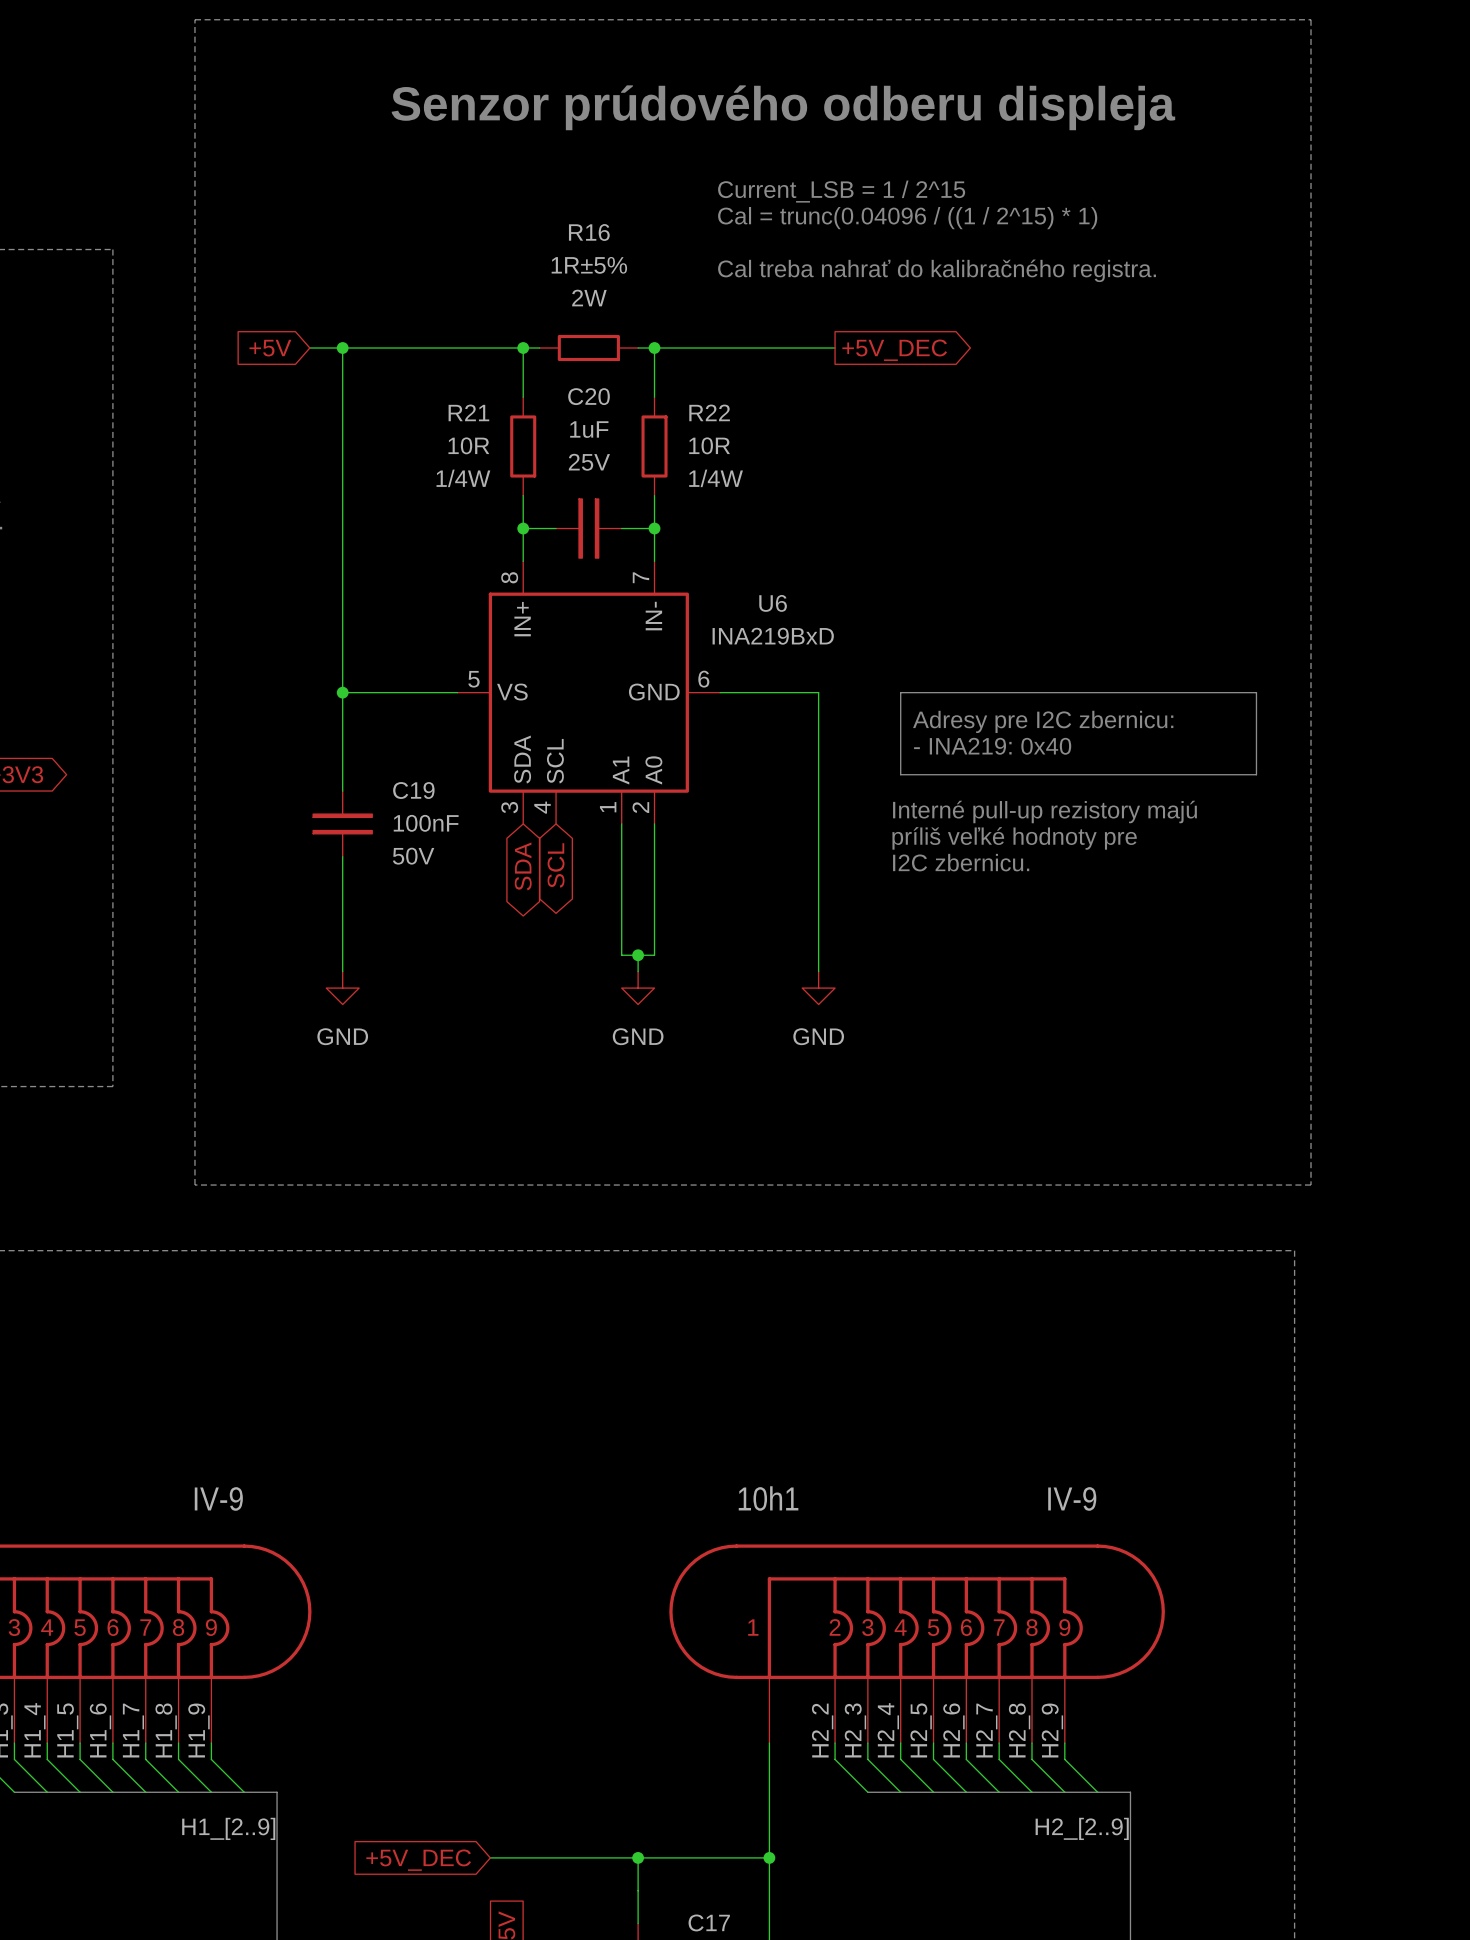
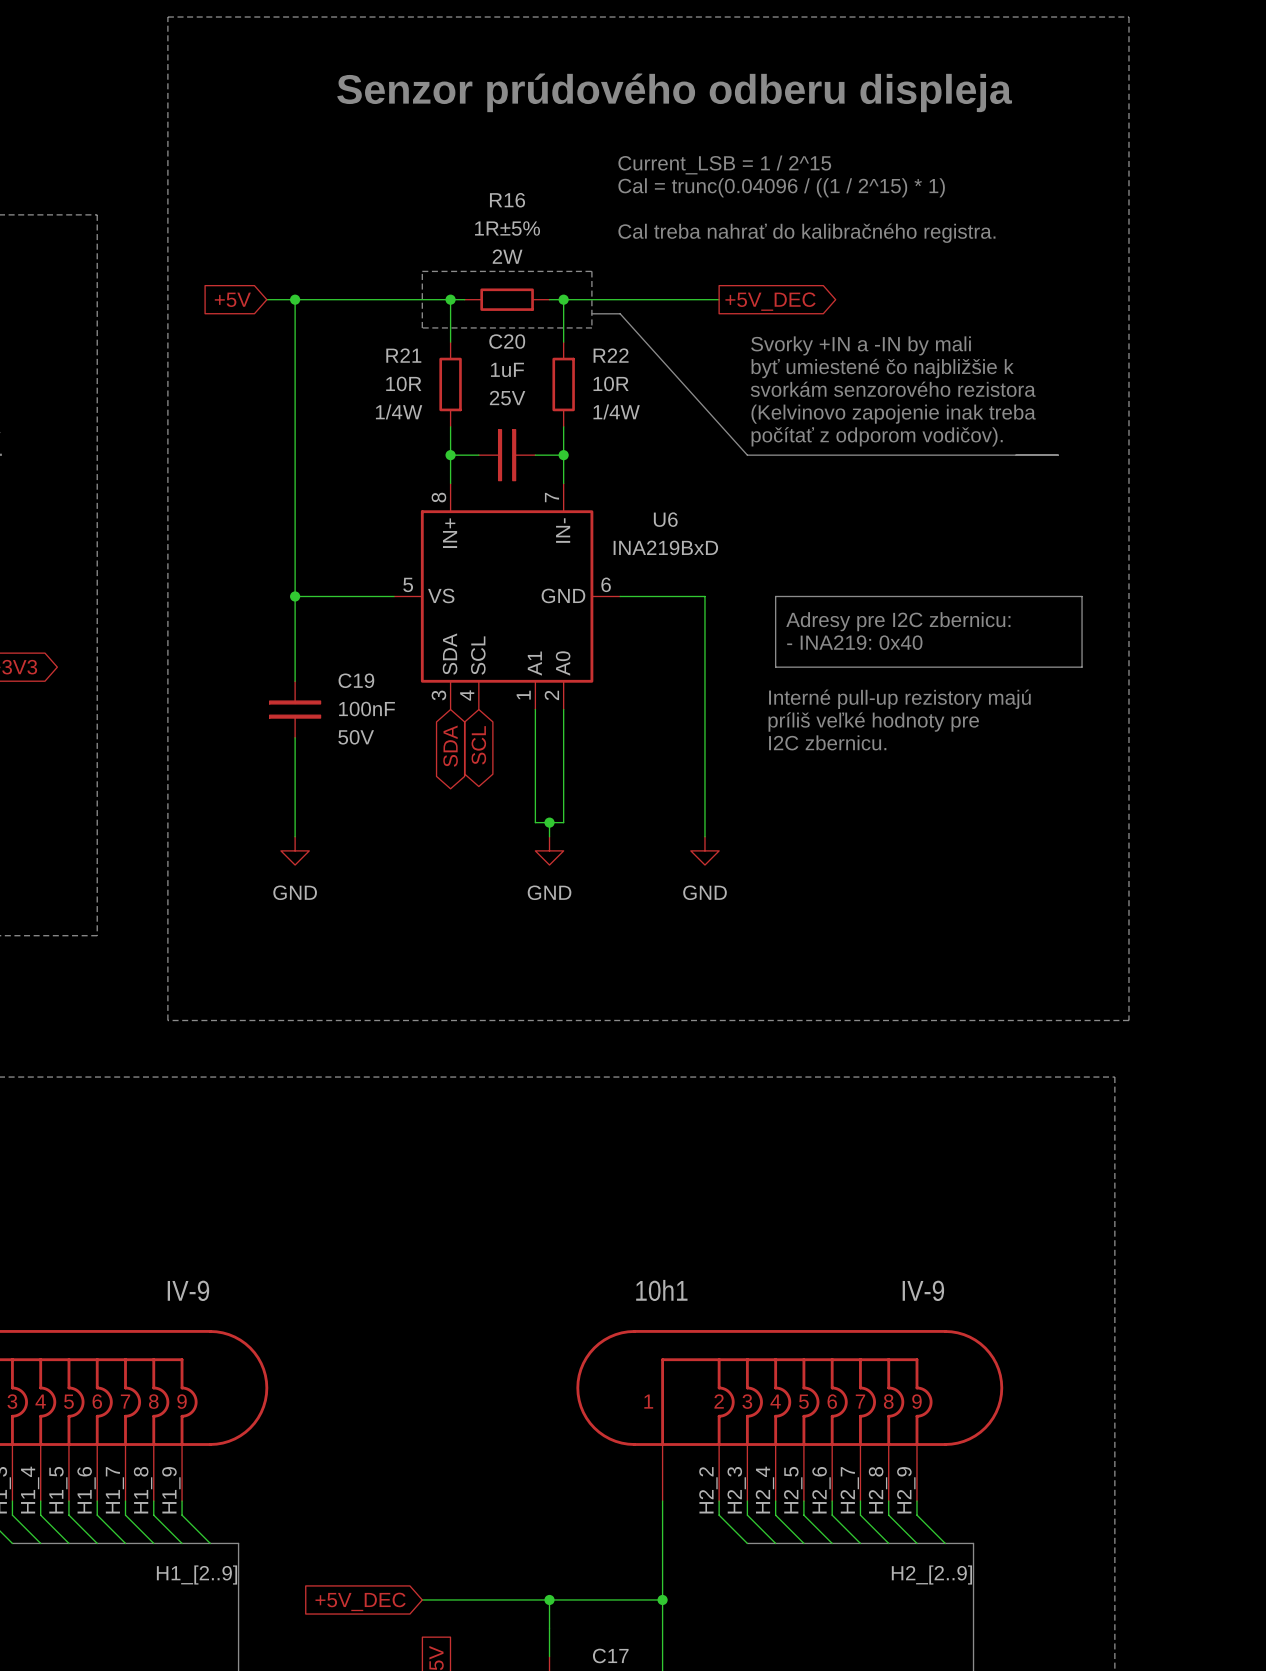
line: none -> (422, 271) (591, 271) (591, 327) (422, 327) (422, 271)
line: none -> (591, 313) (620, 313) (747, 455) (1058, 455)
text: none -> Svorky +IN a -IN by mali (861, 345)
text: none -> byť umiestené čo najbližšie k (882, 368)
text: none -> svorkám senzorového rezistora (893, 389)
text: none -> (Kelvinovo zapojenie inak treba (893, 414)
text: none -> počítať z odporom vodičov). (877, 436)

